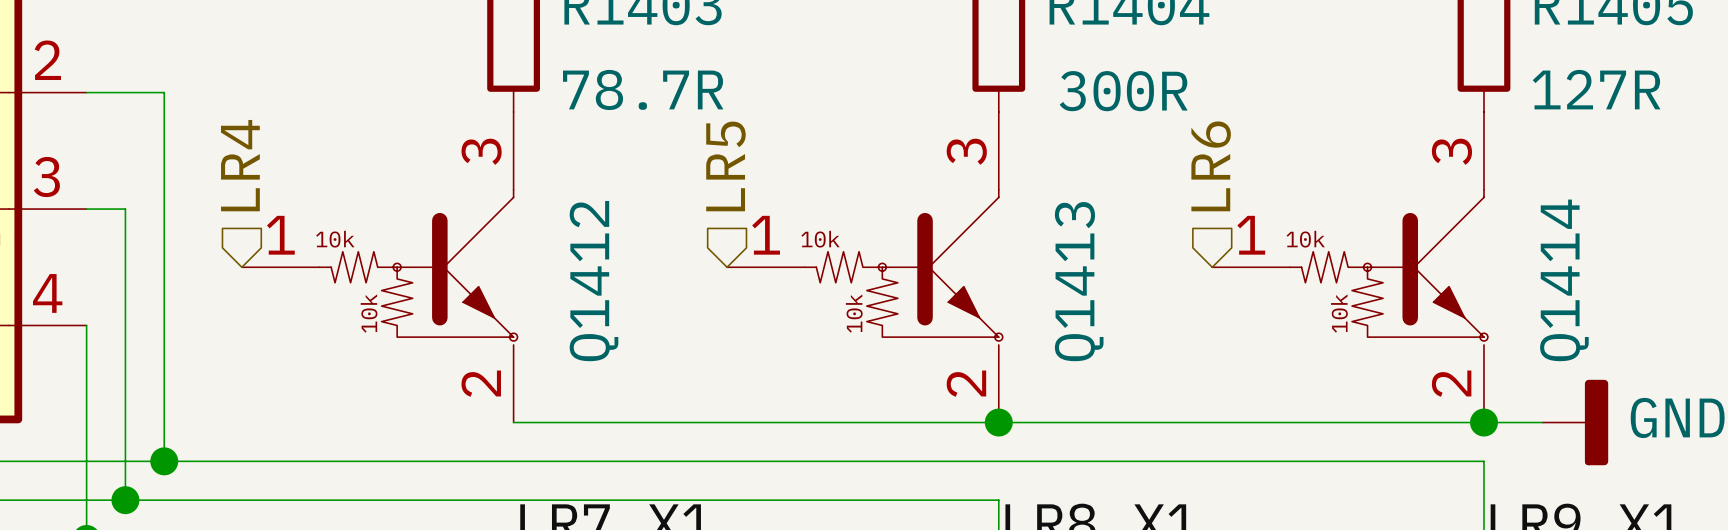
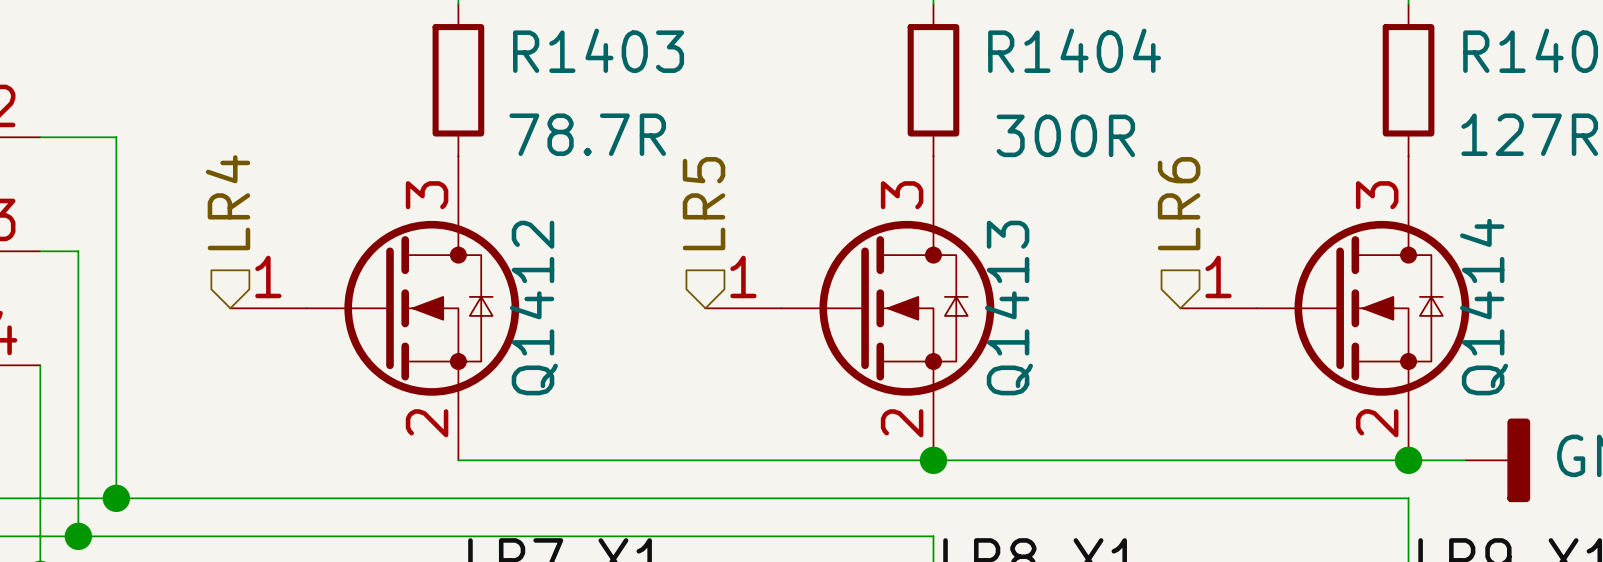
Q1412 symbol: [241, 112, 518, 423] -> [230, 156, 520, 461]
Q1413 symbol: [727, 112, 1003, 423] -> [705, 156, 995, 461]
Q1414 symbol: [1212, 112, 1488, 423] -> [1180, 156, 1470, 461]
hierarchical label position: LR4 (240, 165) -> LR4 (228, 202)
hierarchical label position: LR5 (725, 166) -> LR5 (704, 203)
hierarchical label position: LR6 (1211, 166) -> LR6 (1179, 203)

